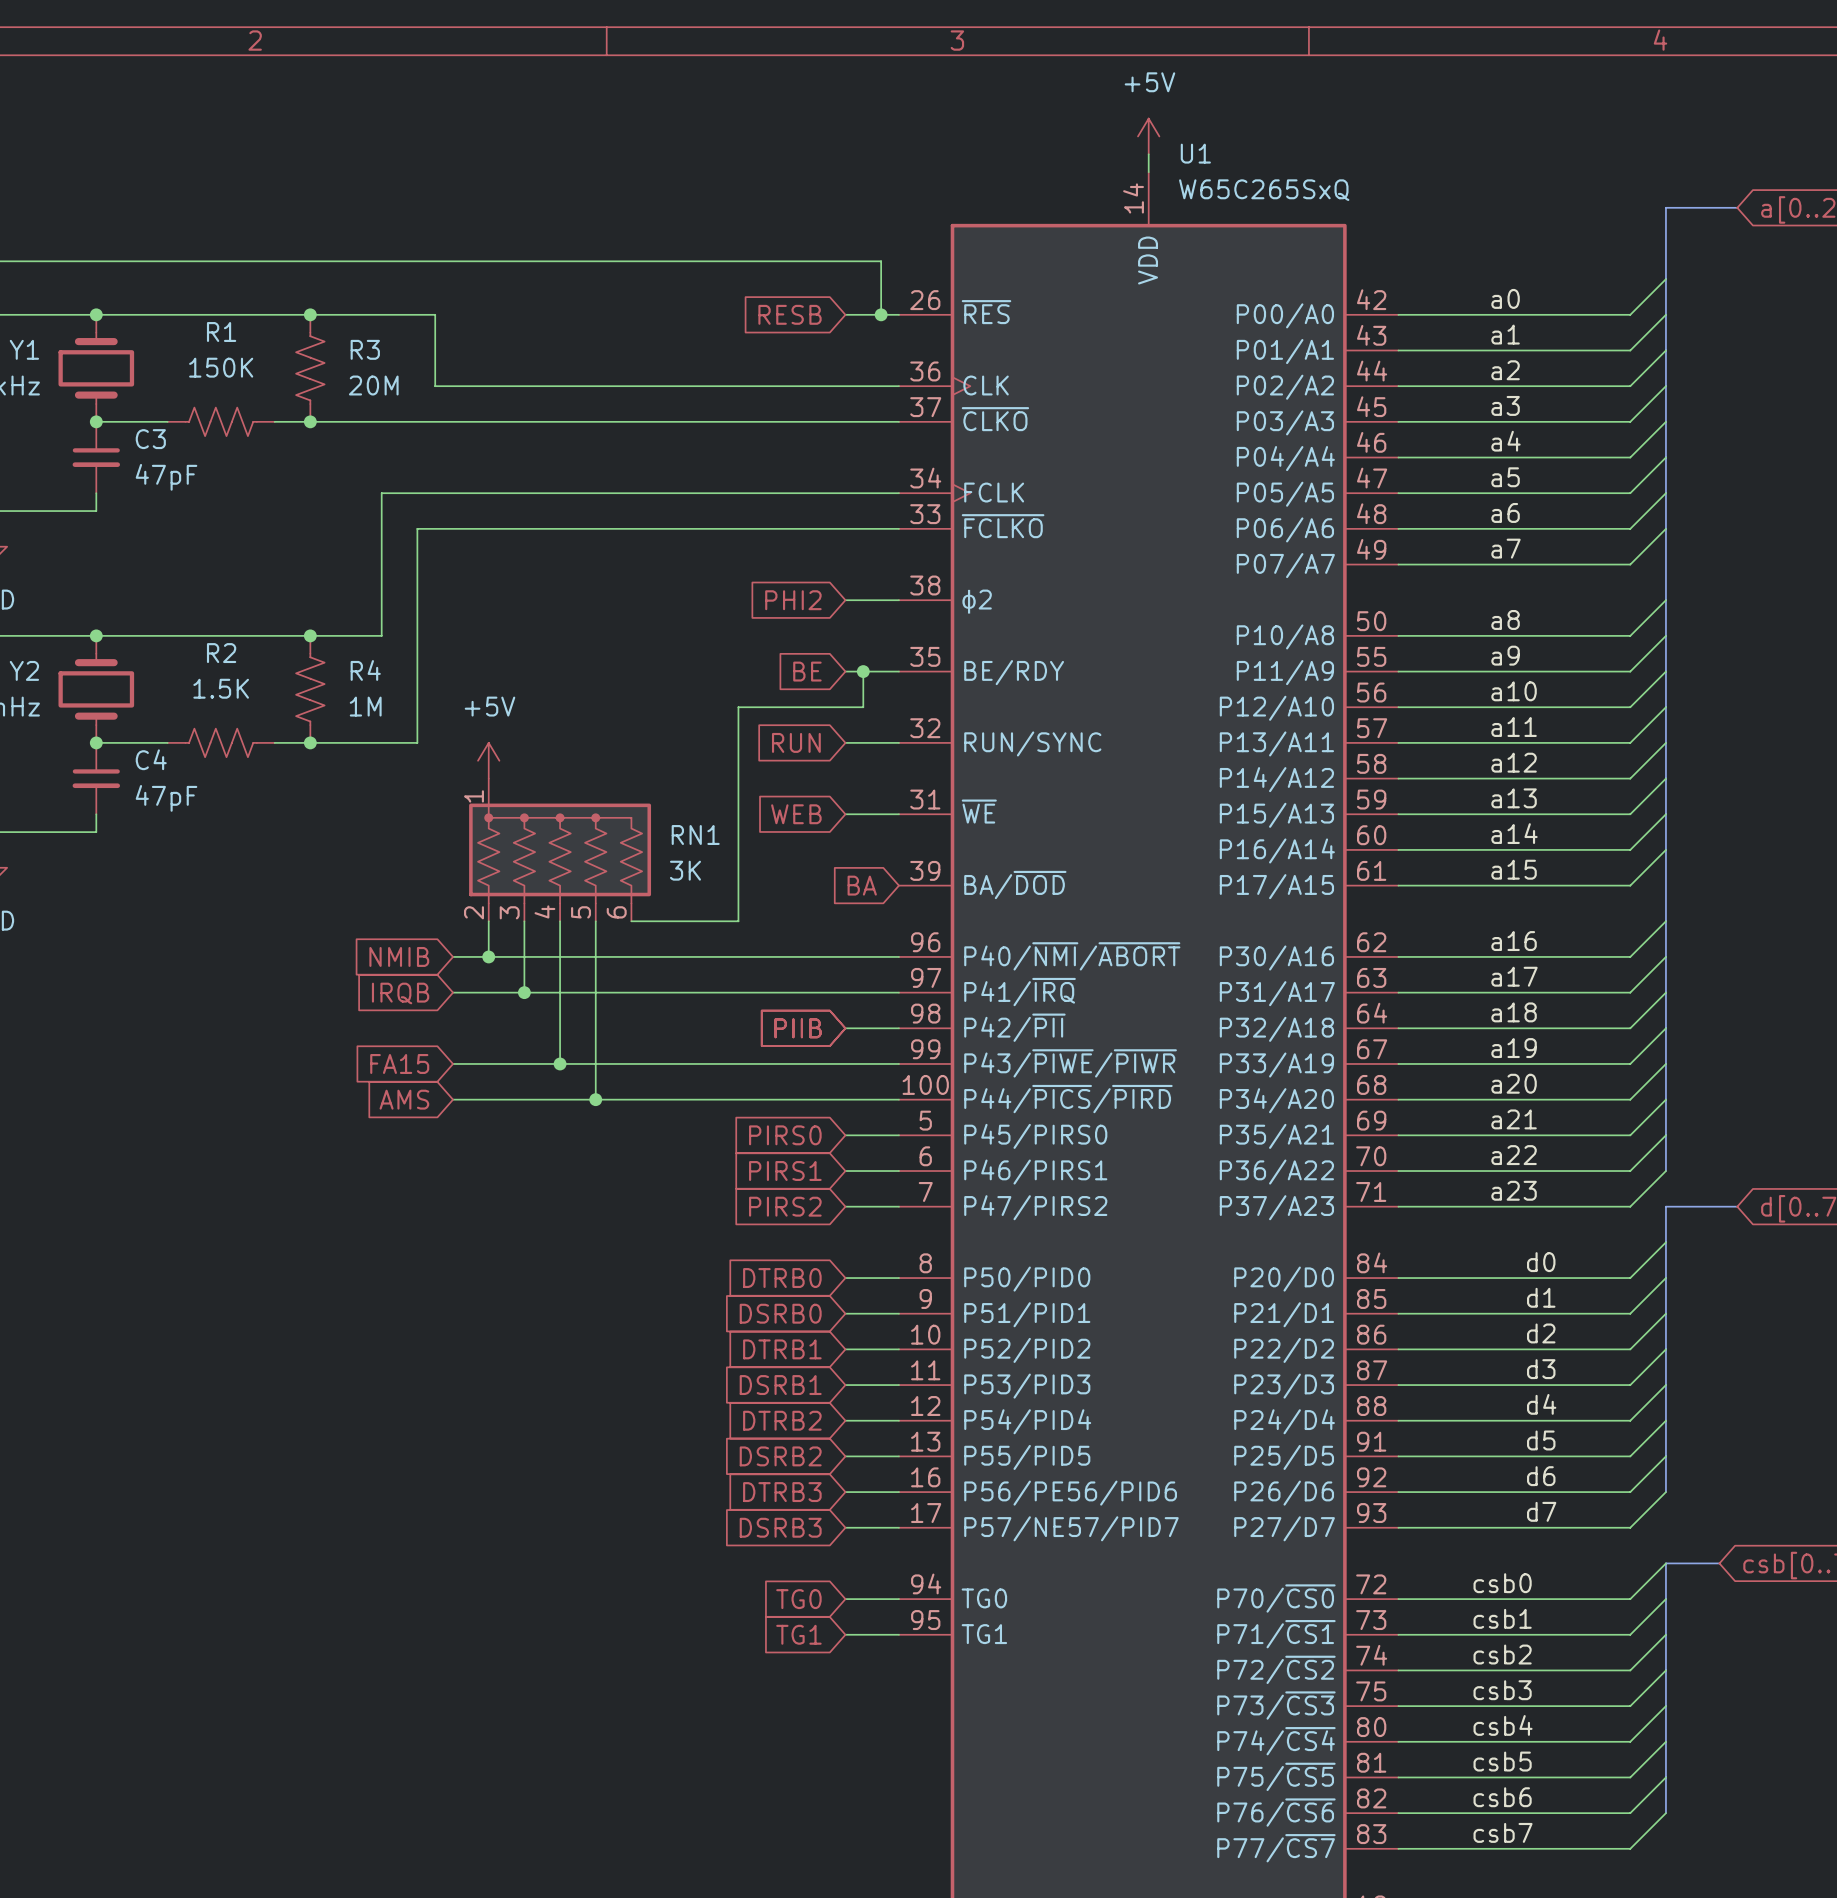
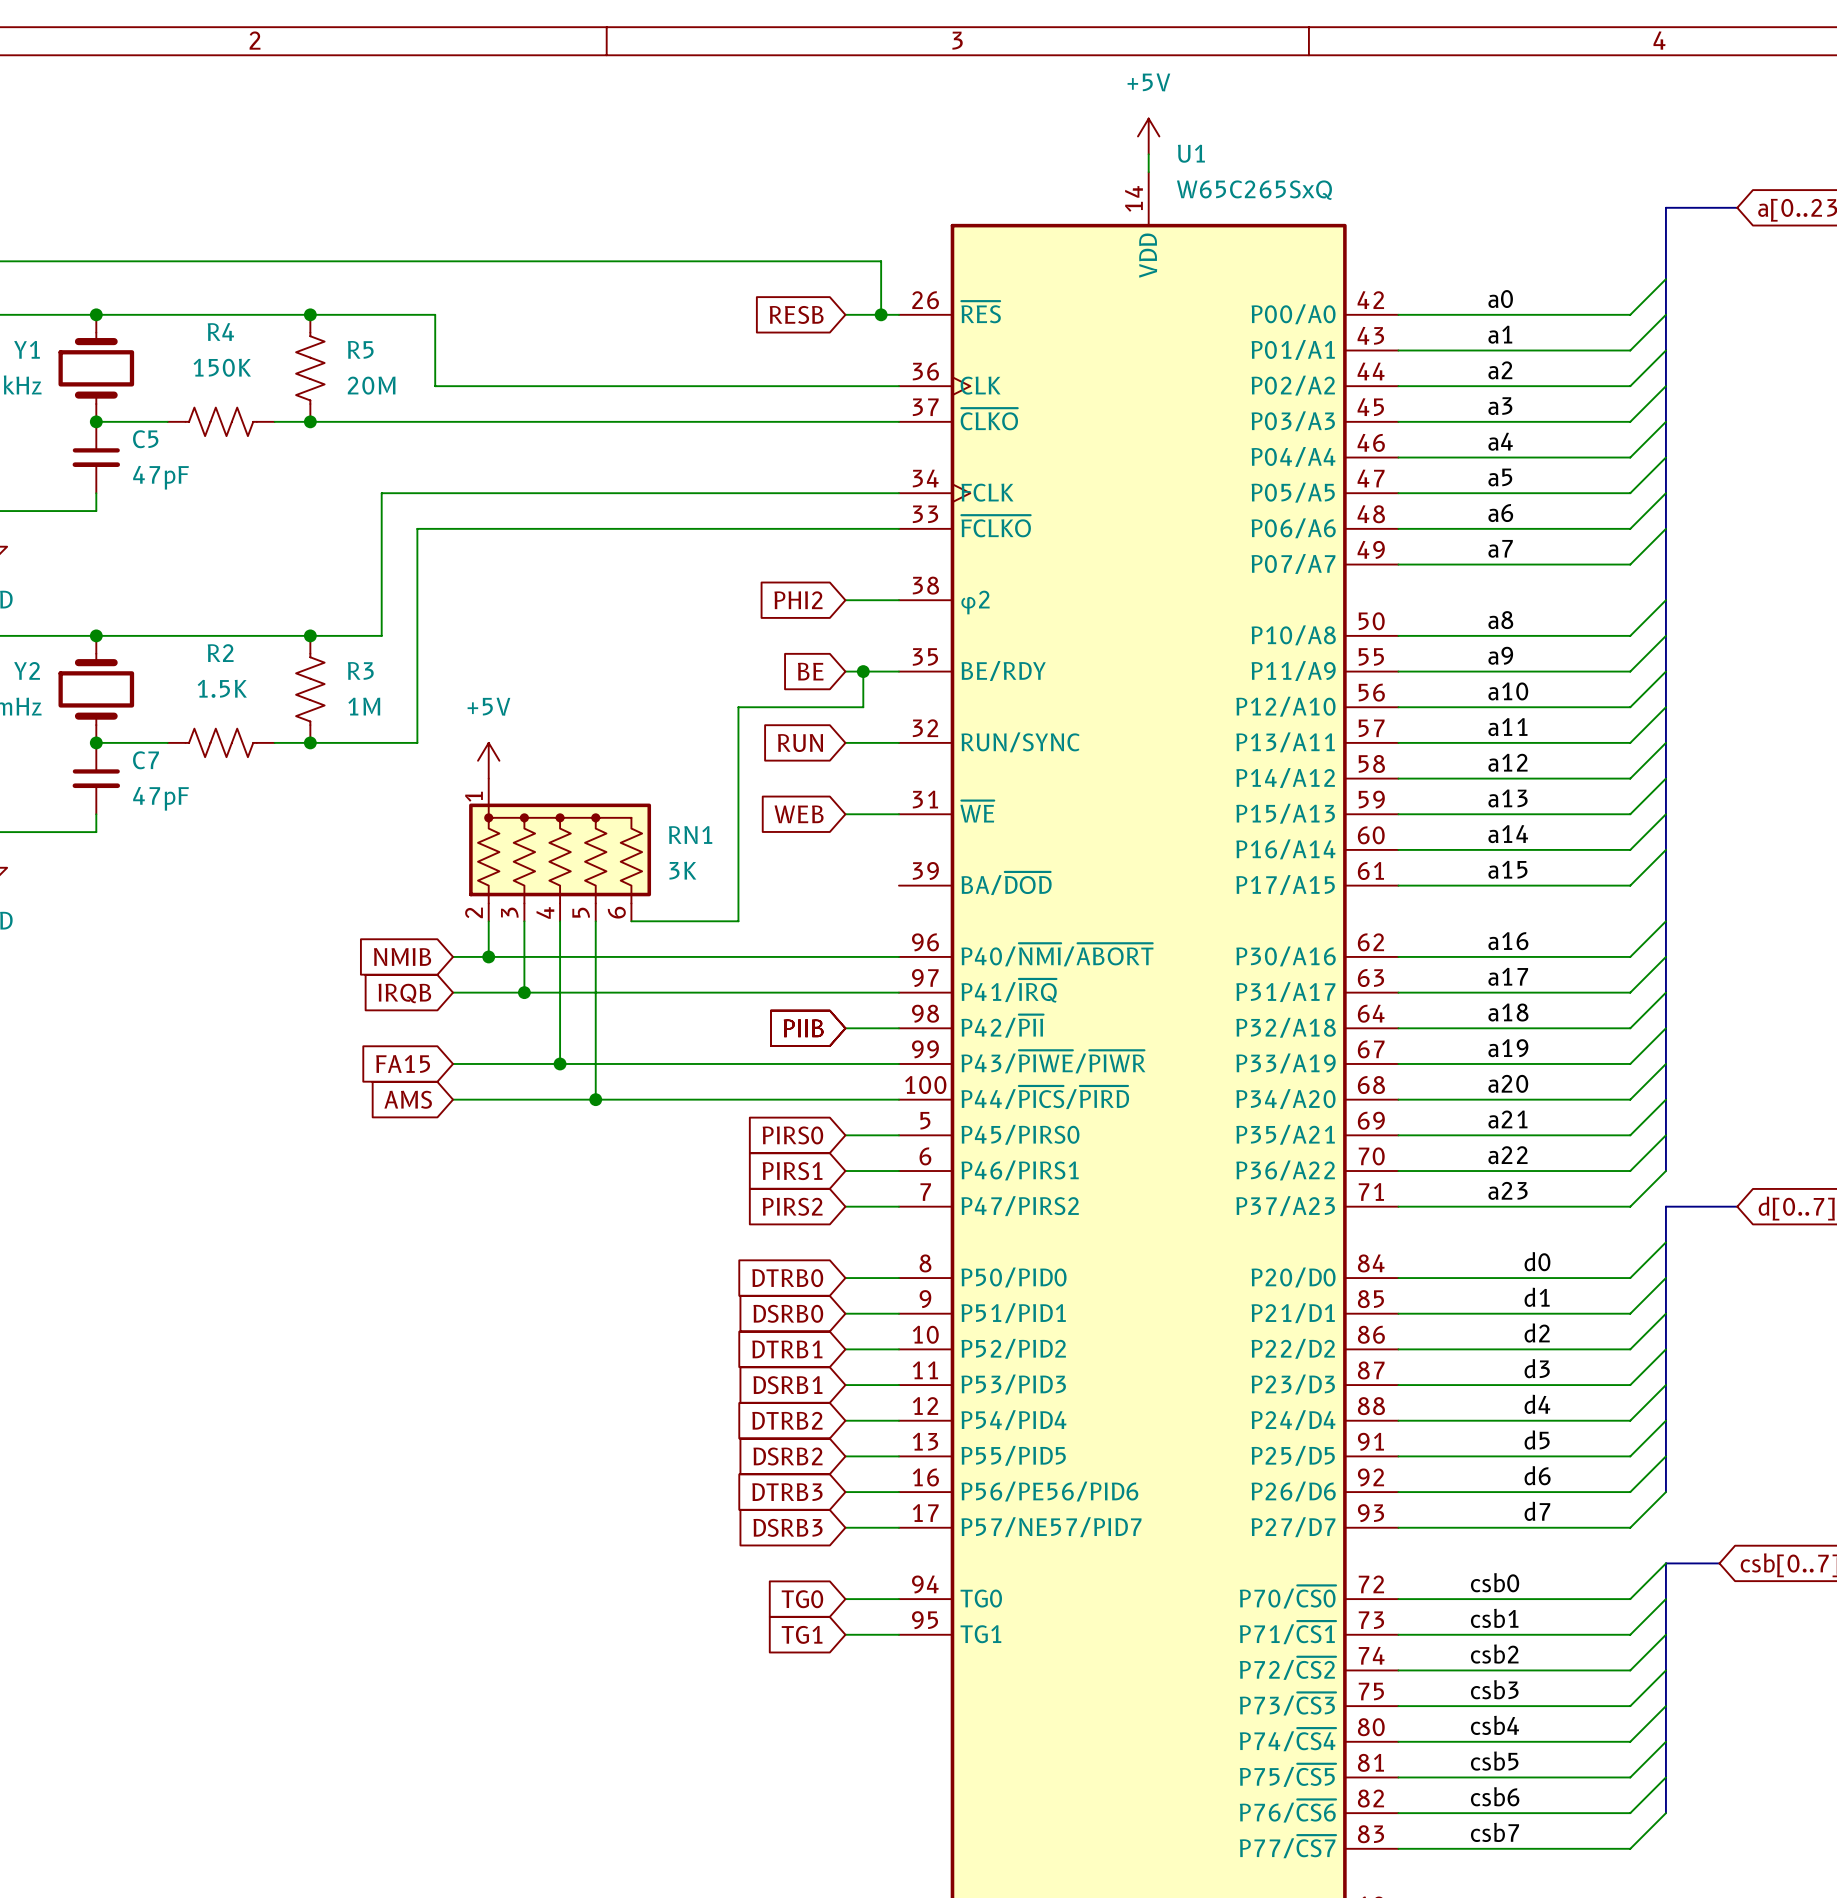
R1 name: R1 (221, 332) -> R4 (220, 332)
R3 name: R3 (365, 349) -> R5 (360, 349)
C3 name: C3 (150, 439) -> C5 (145, 439)
R4 name: R4 (365, 670) -> R3 (360, 670)
C4 name: C4 (151, 759) -> C7 (146, 760)
global label: BA (862, 885) -> none

